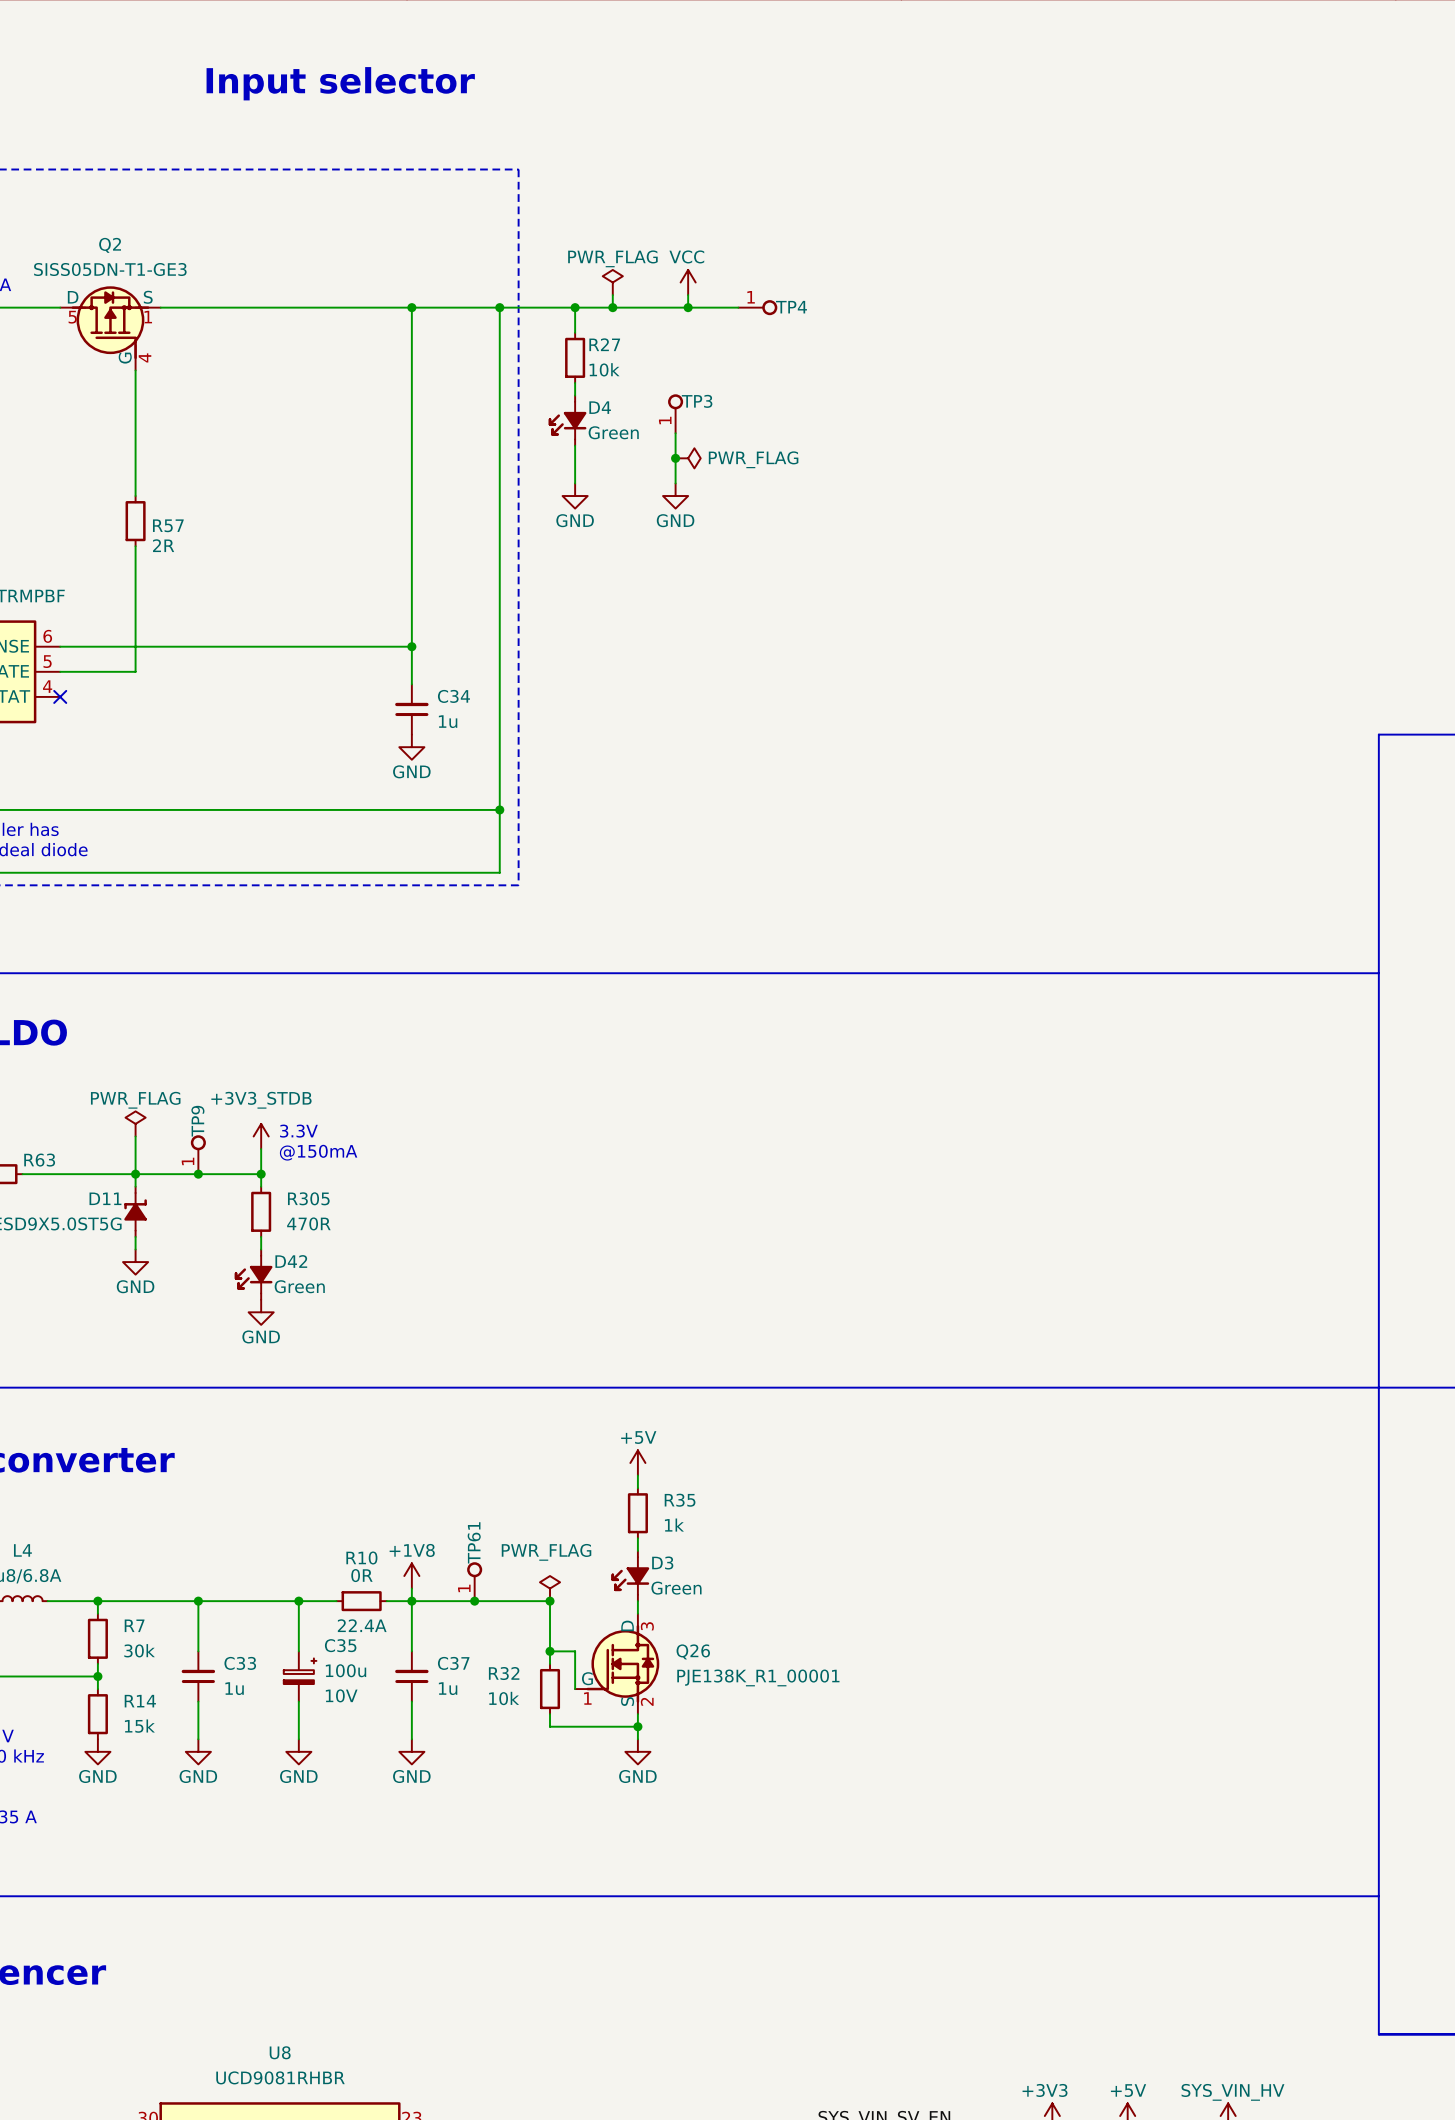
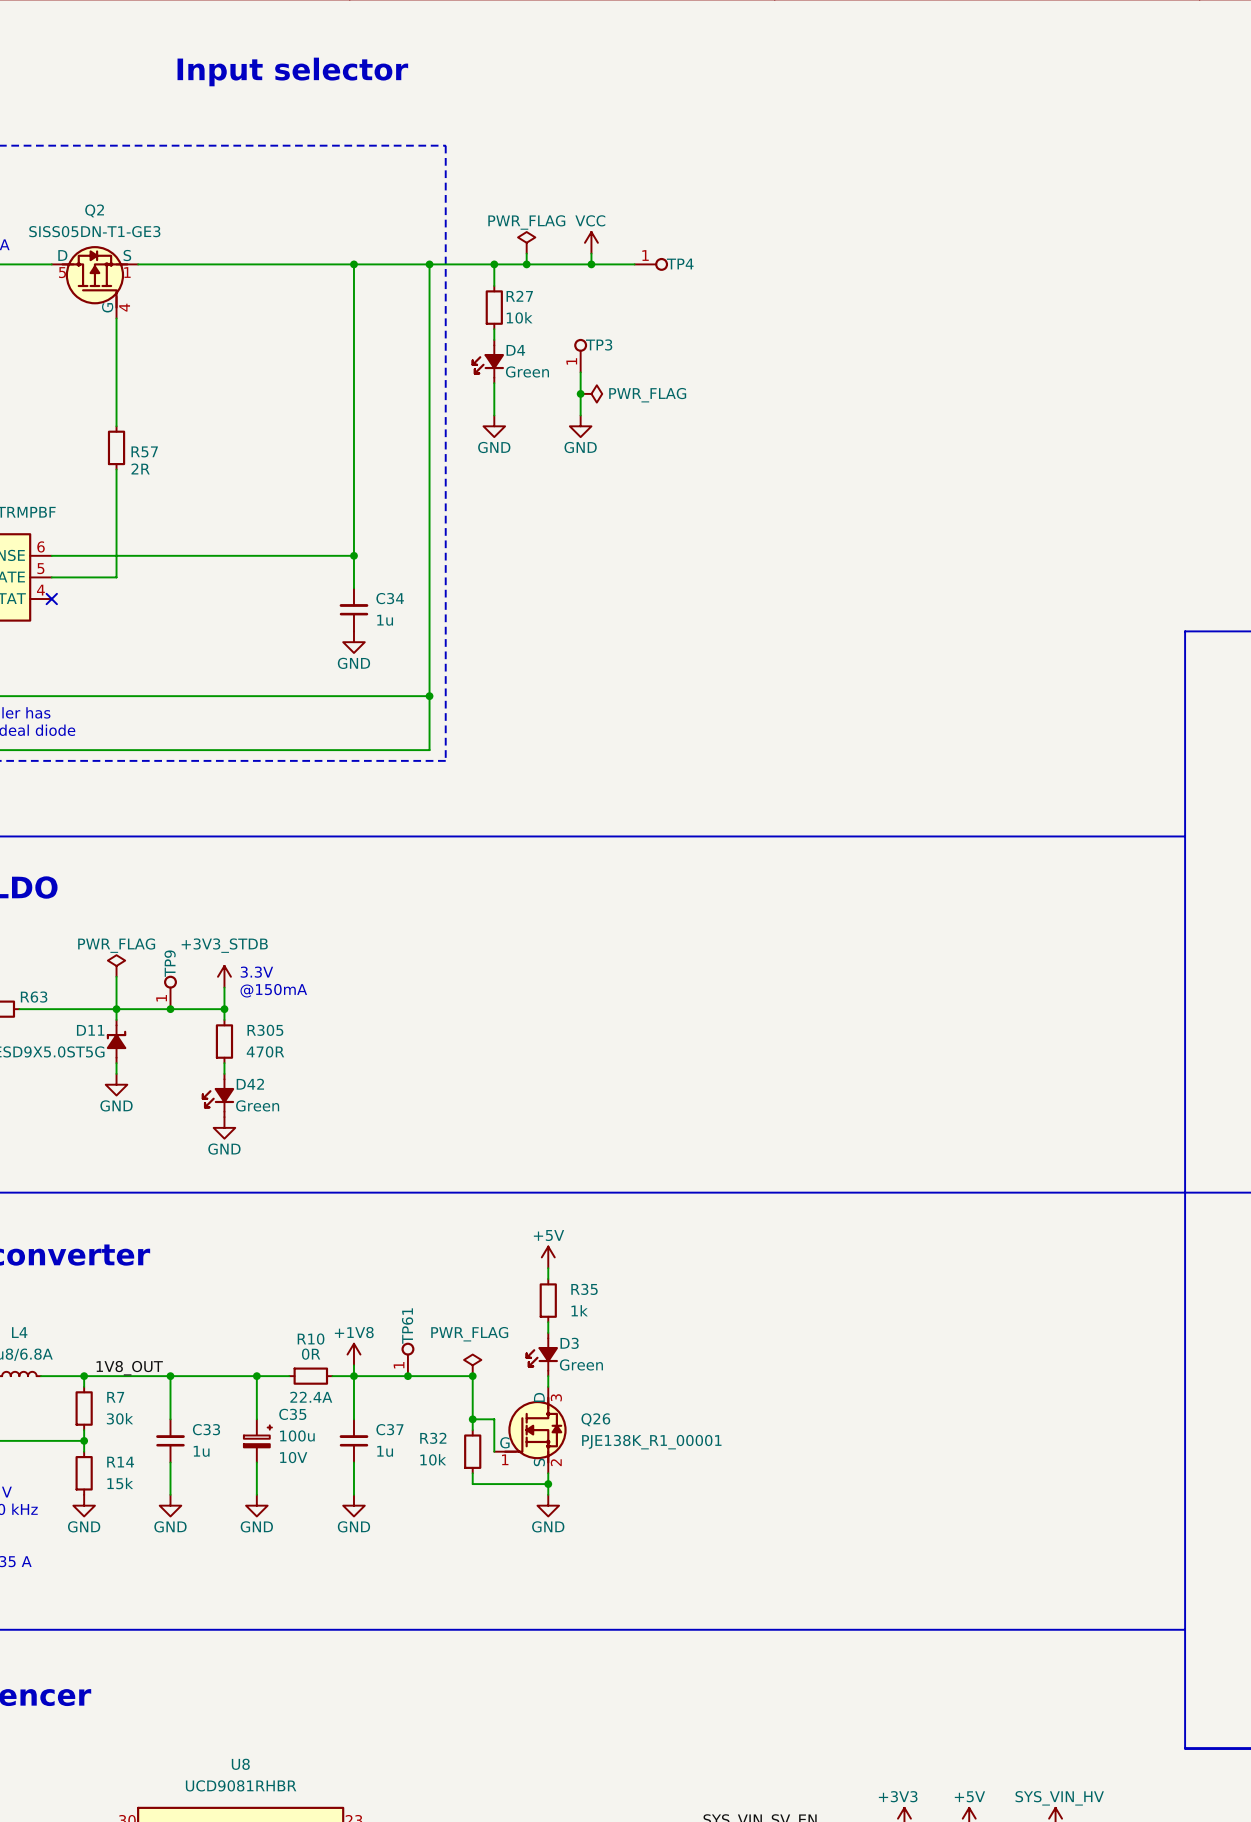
label: none -> 1V8_OUT (129, 1368)

